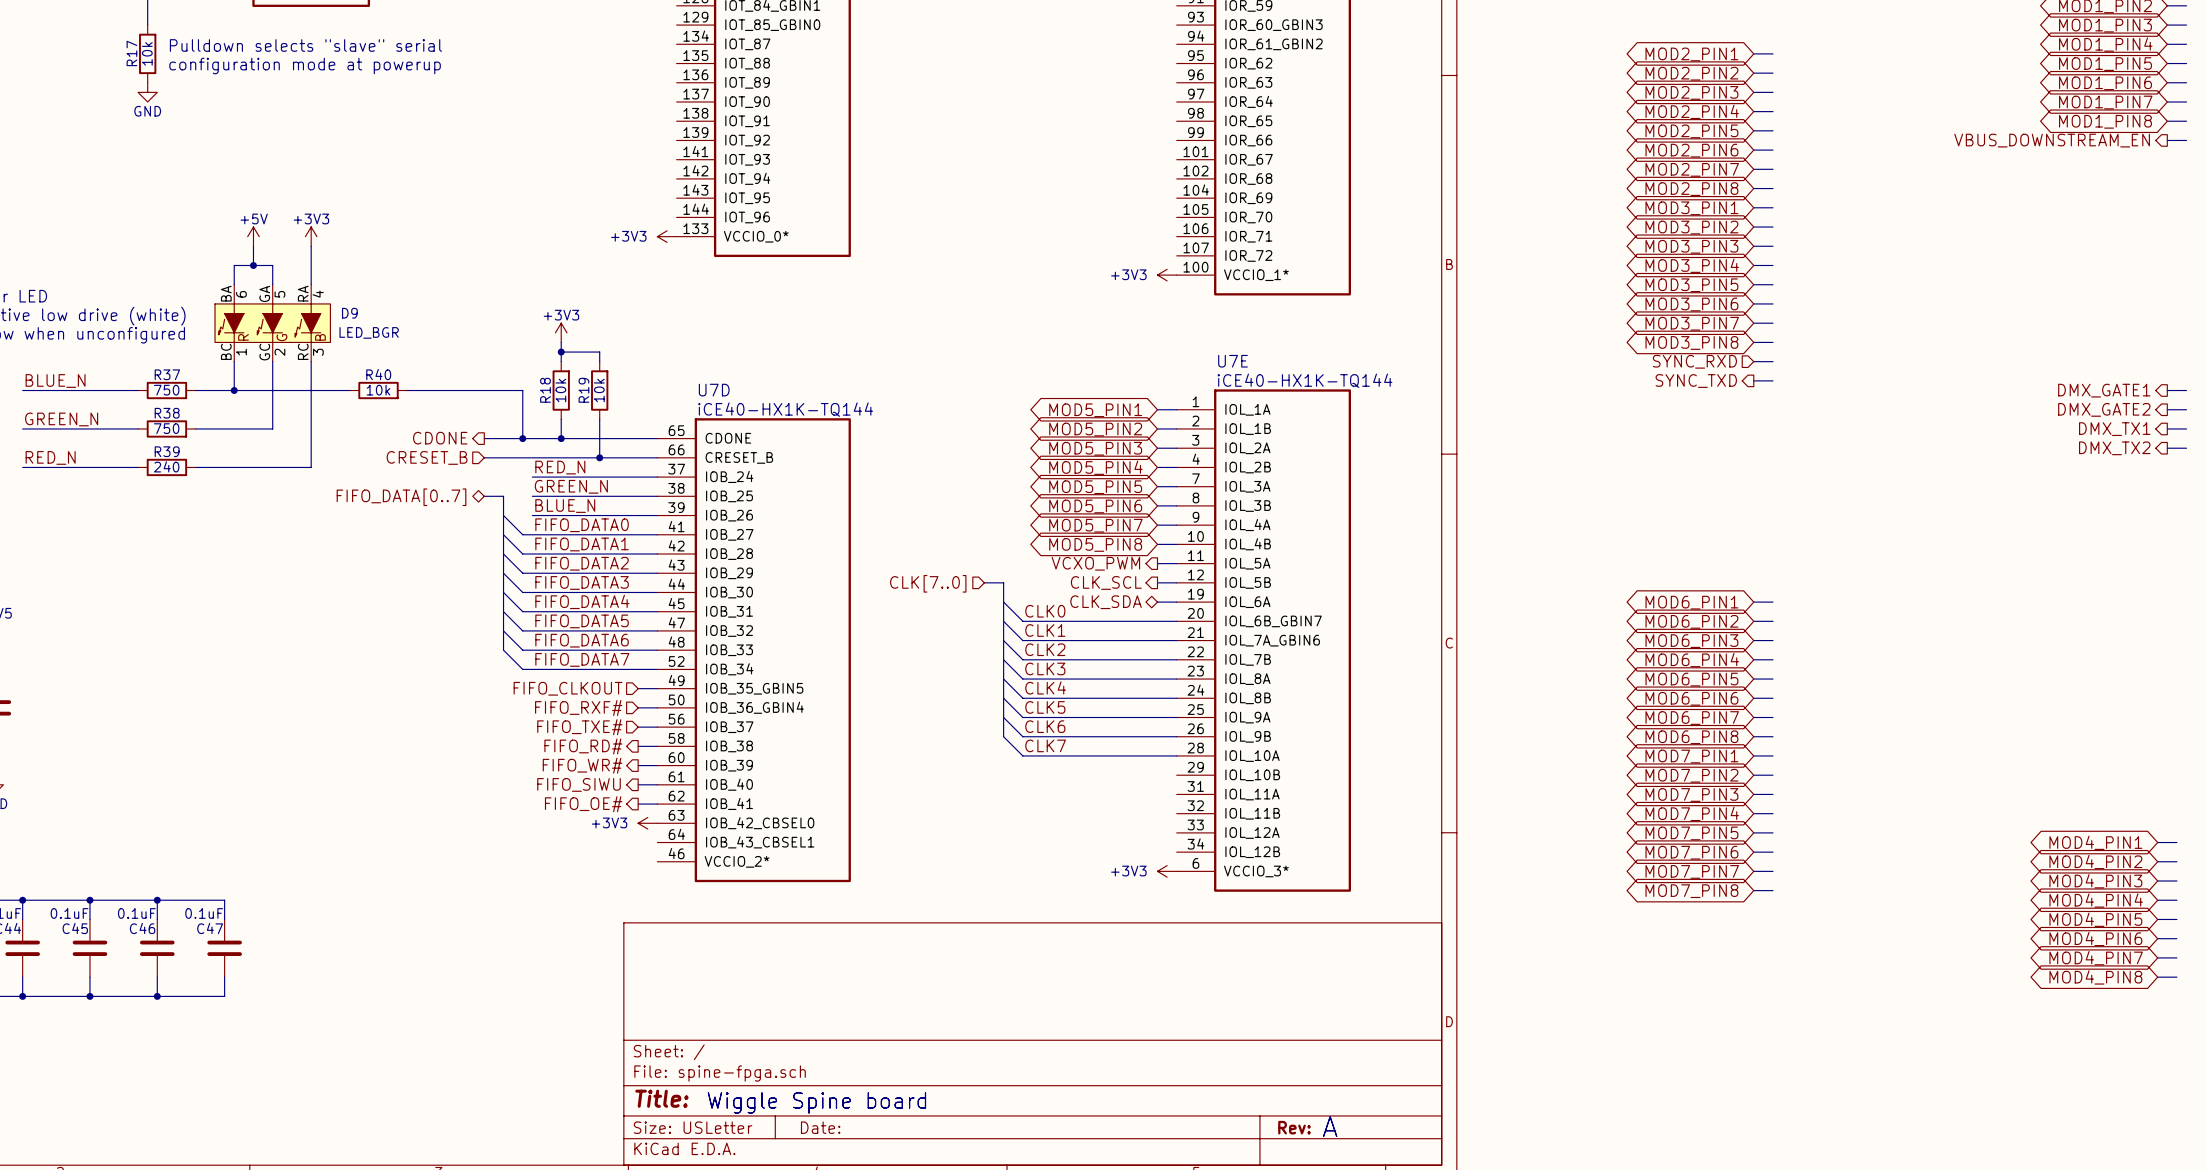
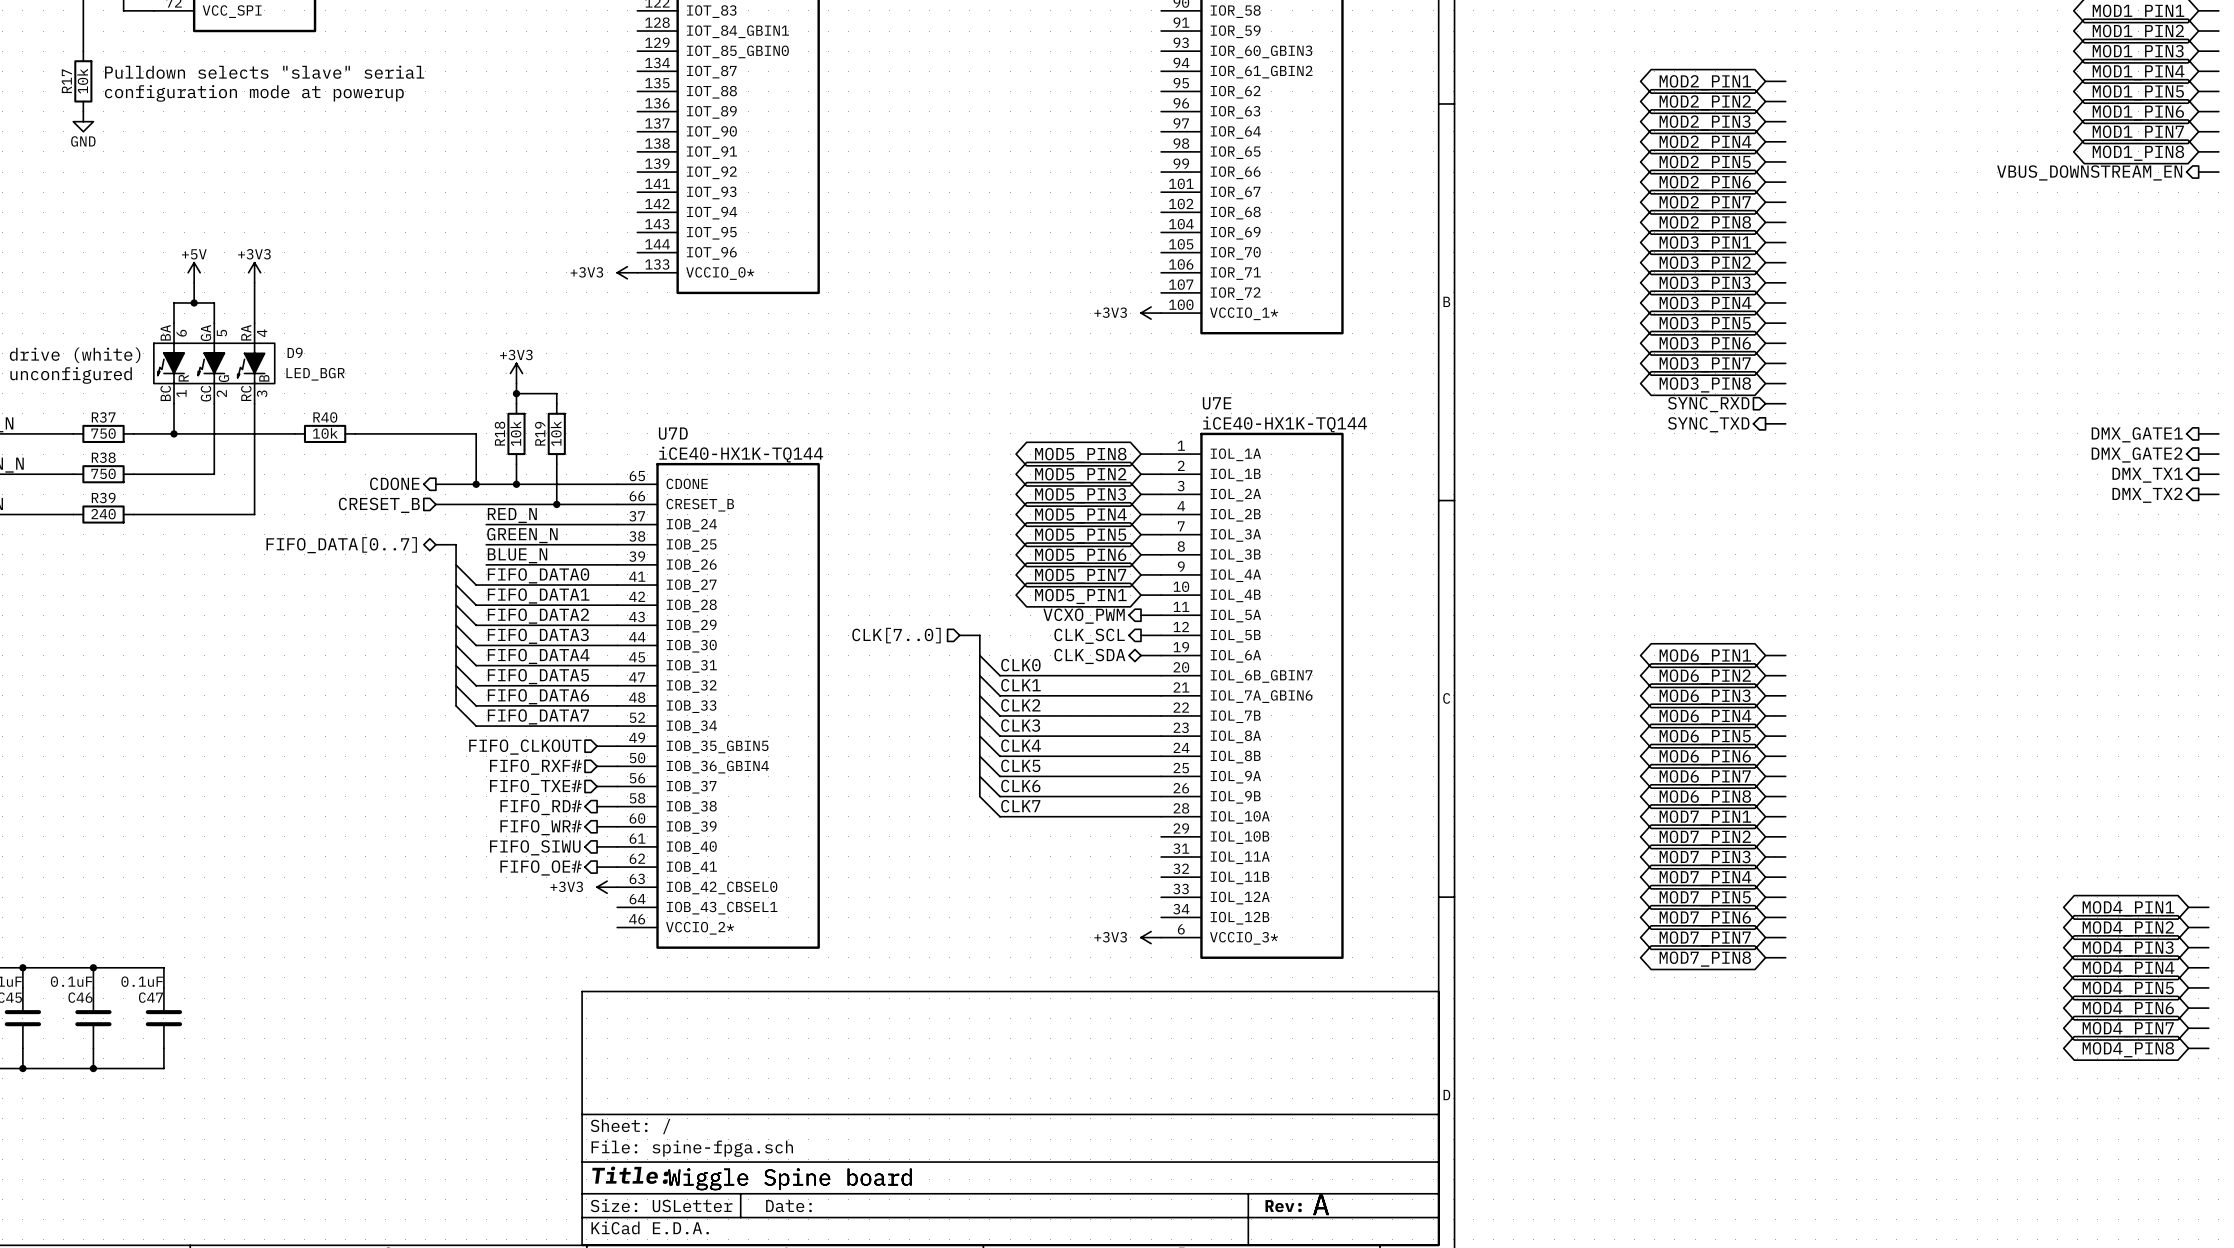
global label: MOD5_PIN1 (1095, 410) -> MOD5_PIN8 (1080, 455)
global label: MOD5_PIN8 (1095, 544) -> MOD5_PIN1 (1080, 596)

